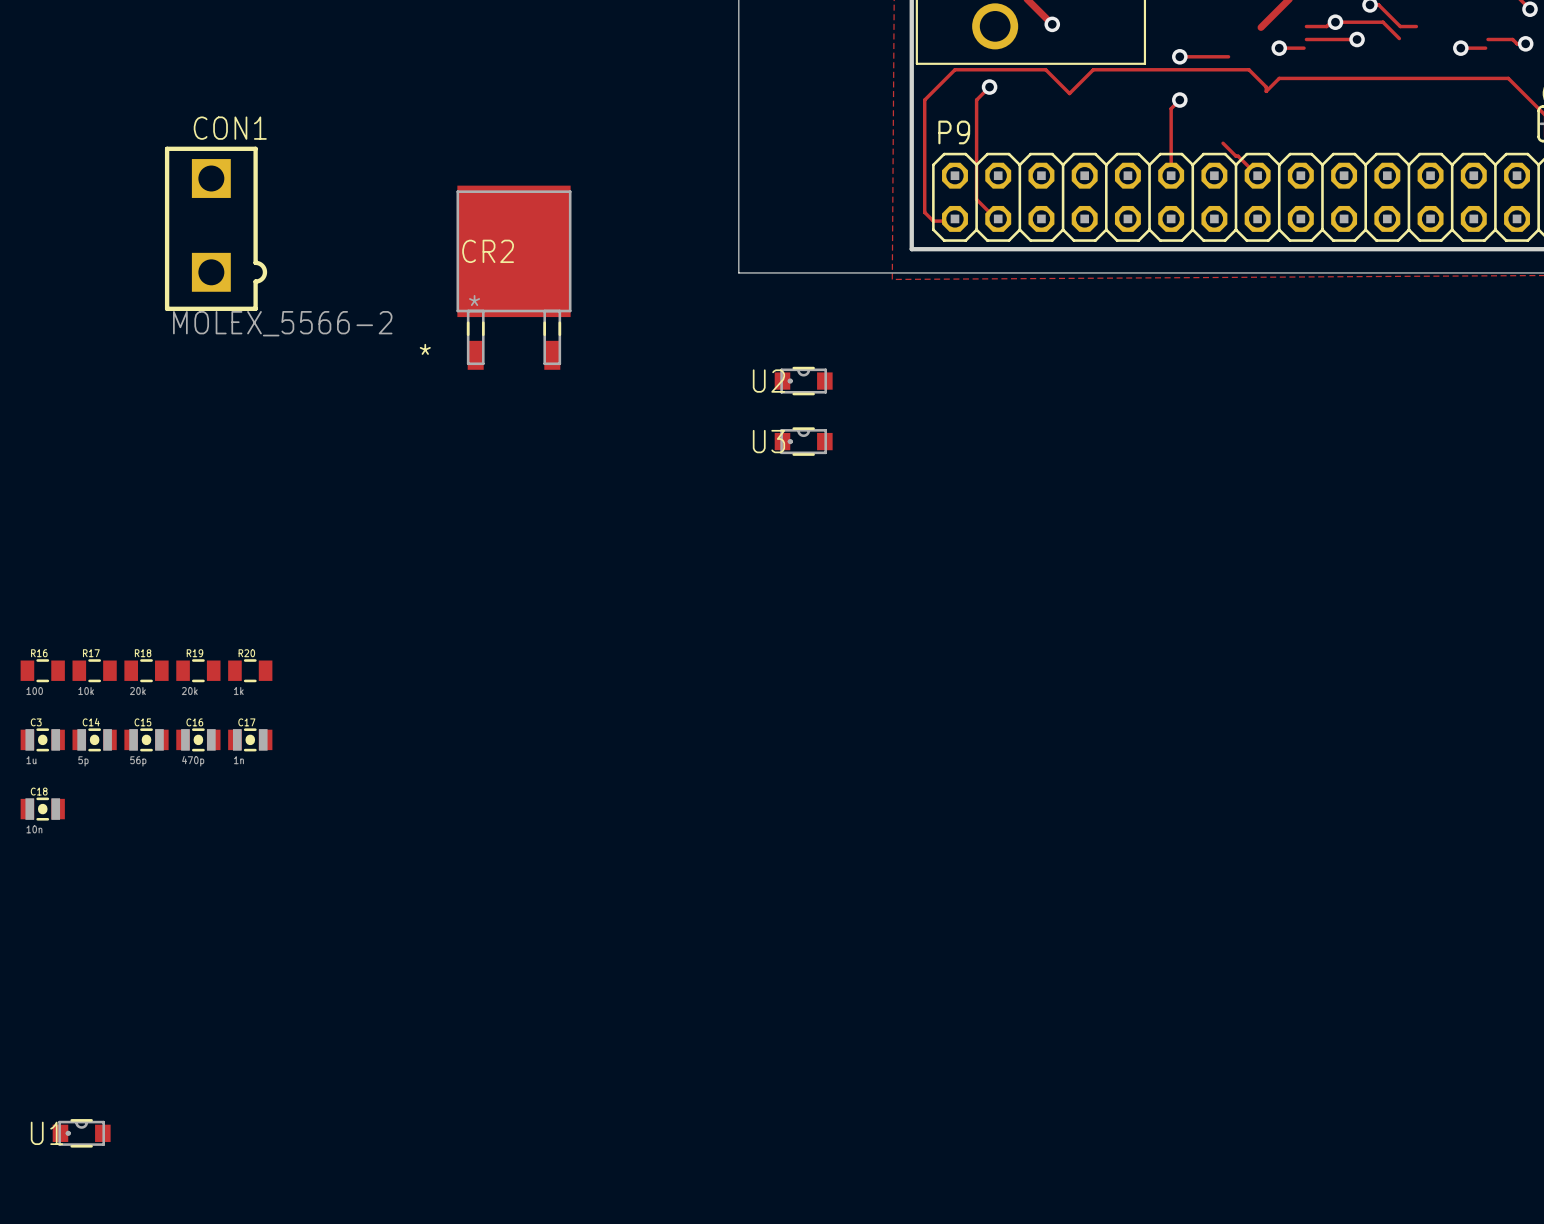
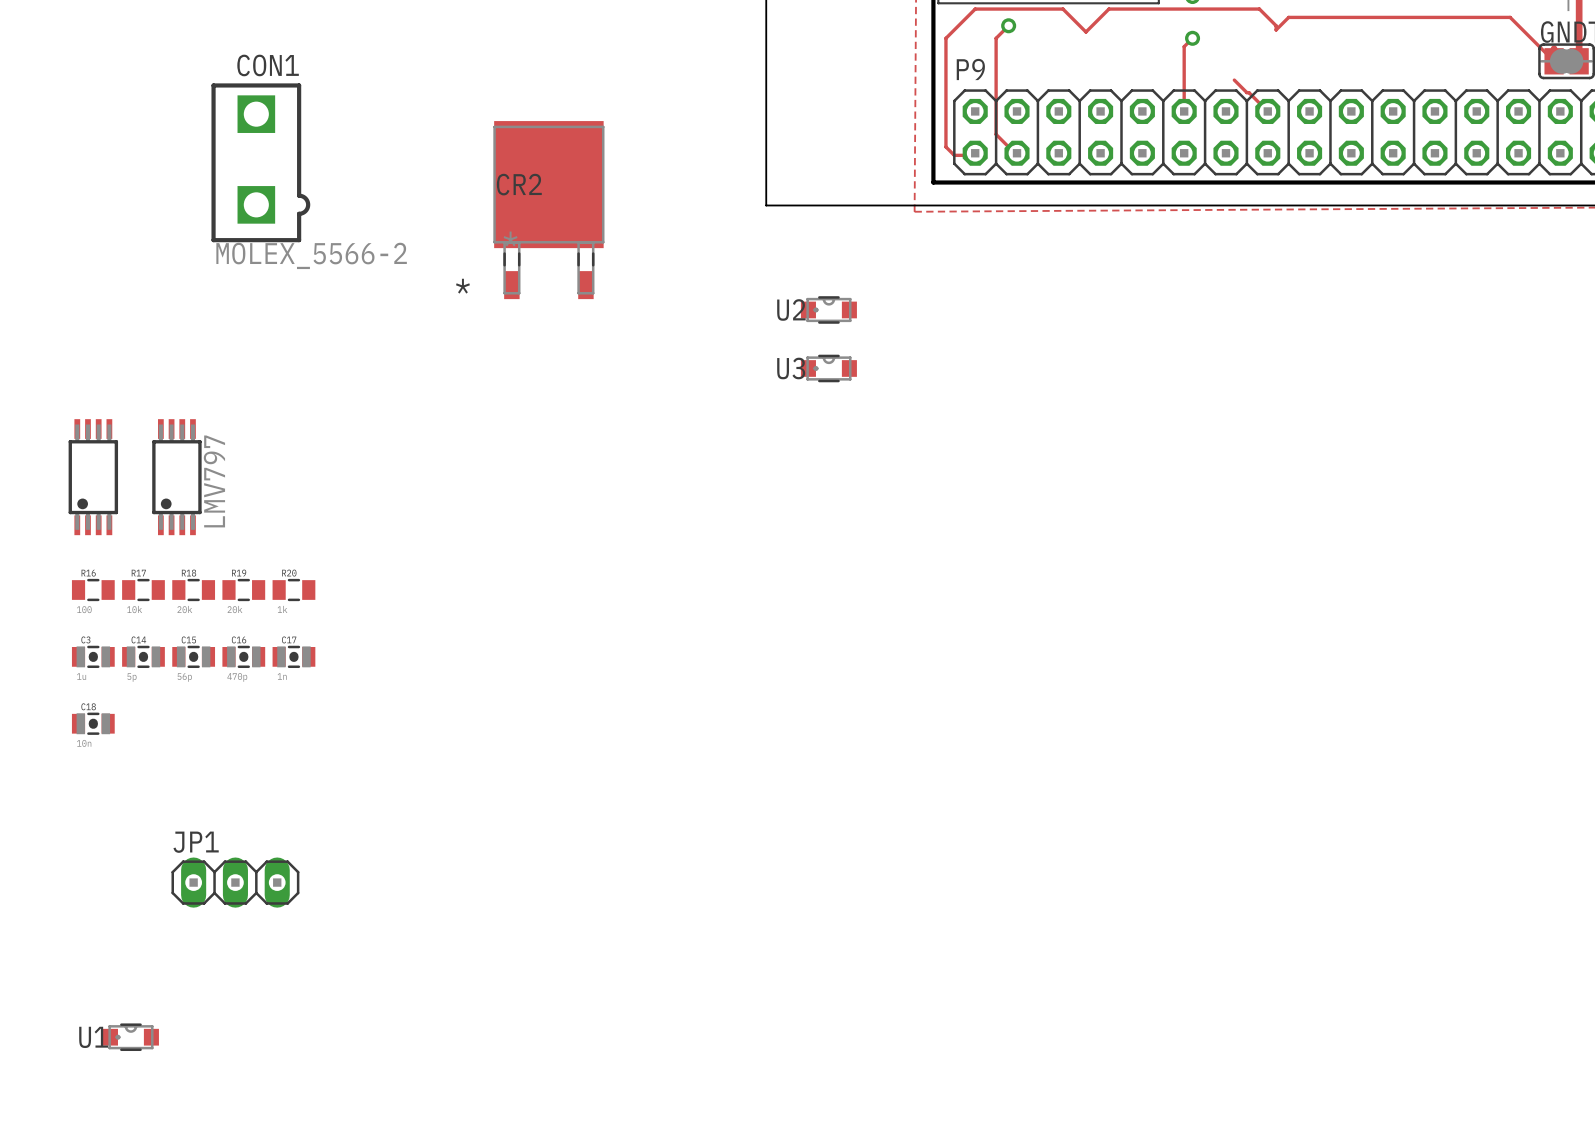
part: none -> (93, 477)
part: none -> LMV797 (176, 477)
JP1: none -> (235, 882)

